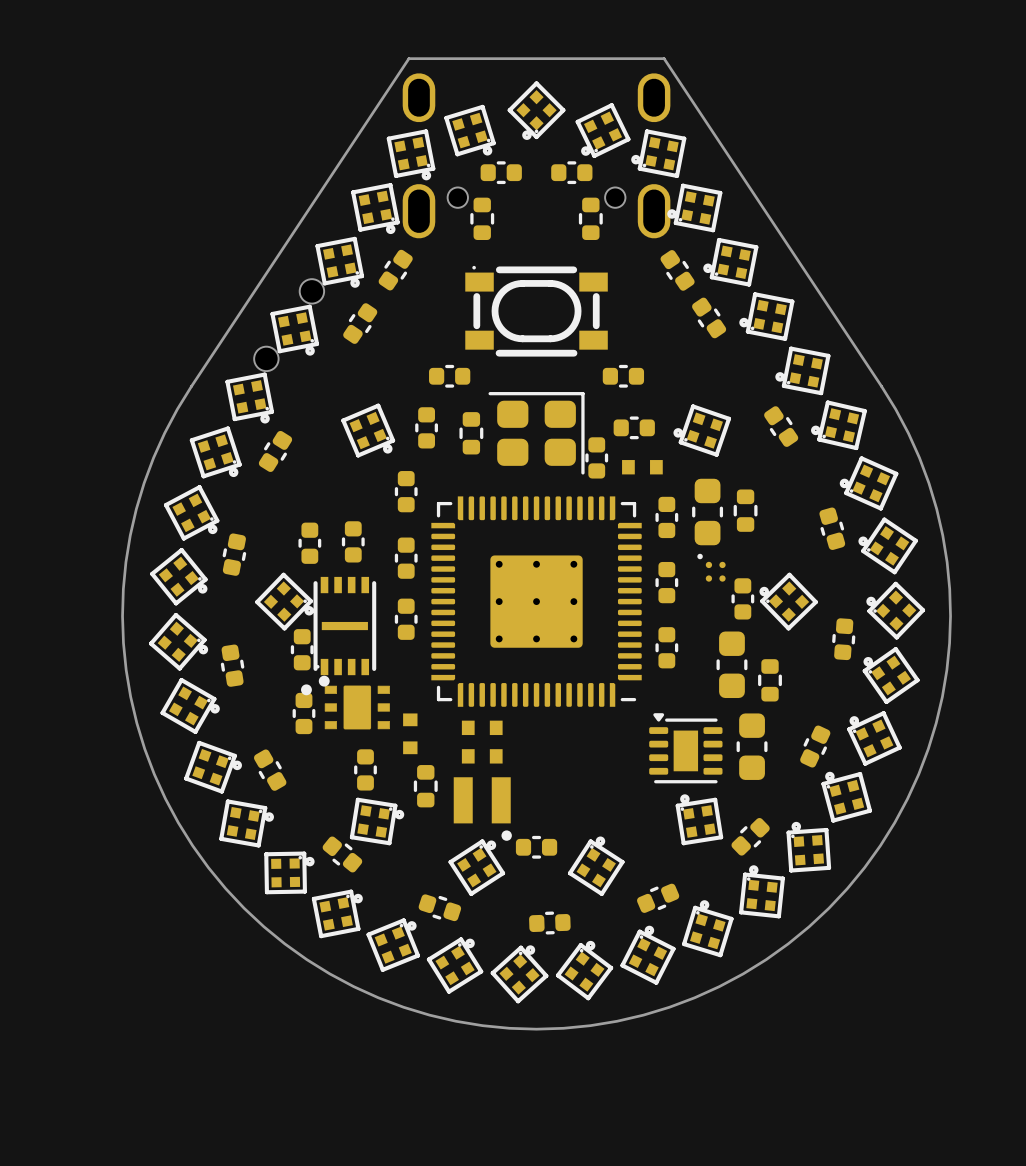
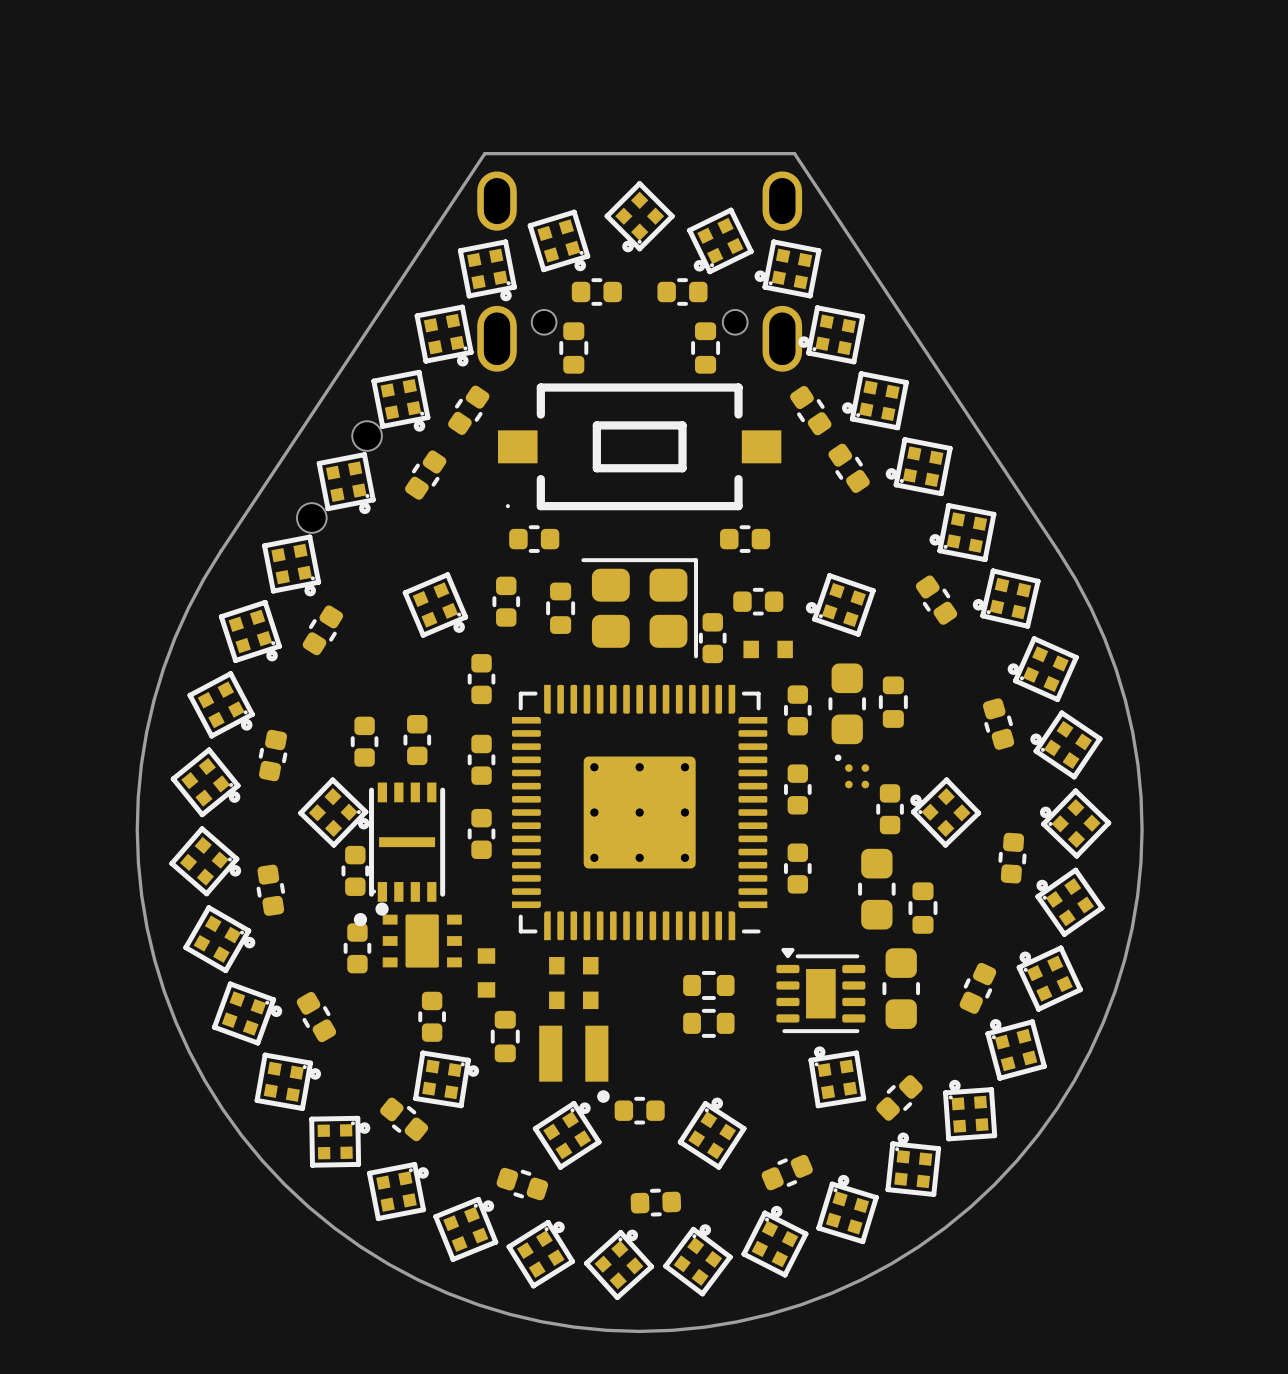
part footprint: [465, 266, 608, 357] -> [498, 383, 782, 511]
part: none -> (708, 985)
part: none -> (708, 1023)

